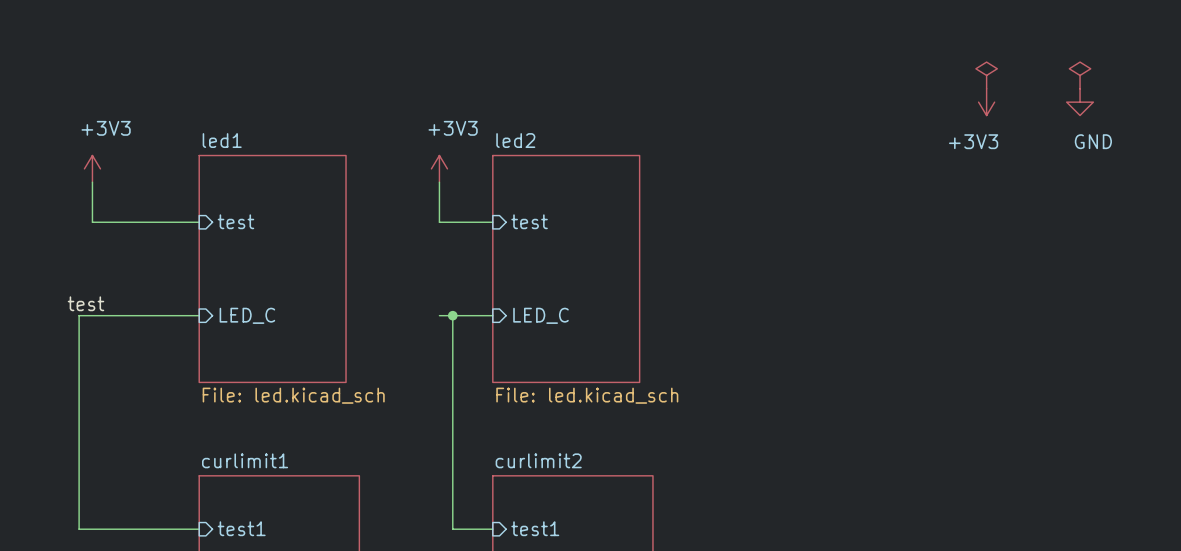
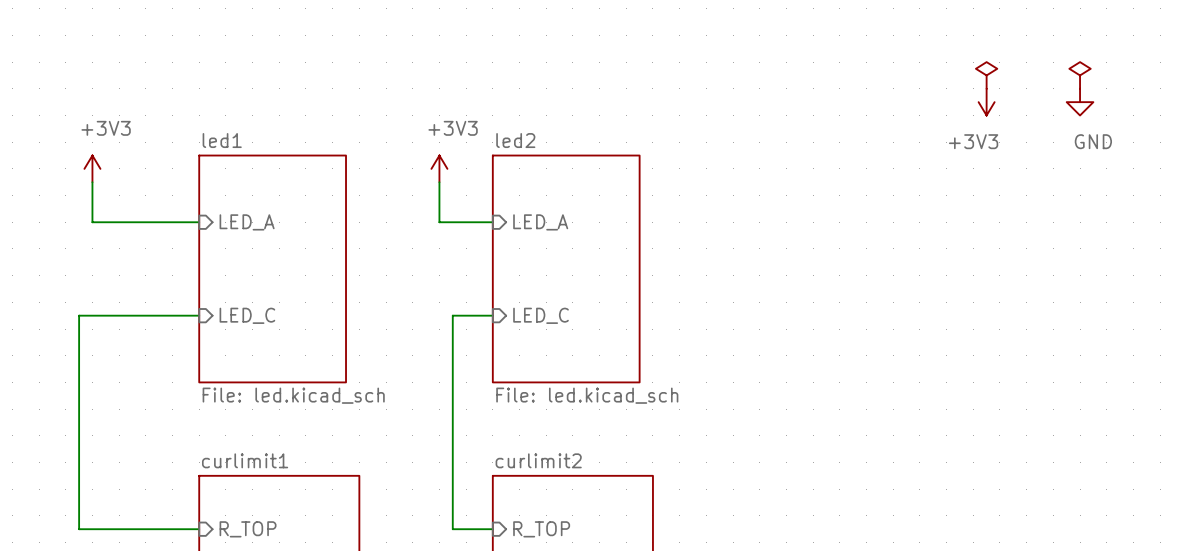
sheet pin: test (235, 221) -> LED_A (247, 222)
sheet pin: test (529, 221) -> LED_A (540, 222)
label: test (85, 303) -> none
wire: (439, 315) (452, 315) -> none
junction: (452, 315) -> none
sheet pin: test1 (241, 528) -> R_TOP (248, 529)
sheet pin: test1 (535, 528) -> R_TOP (541, 529)

